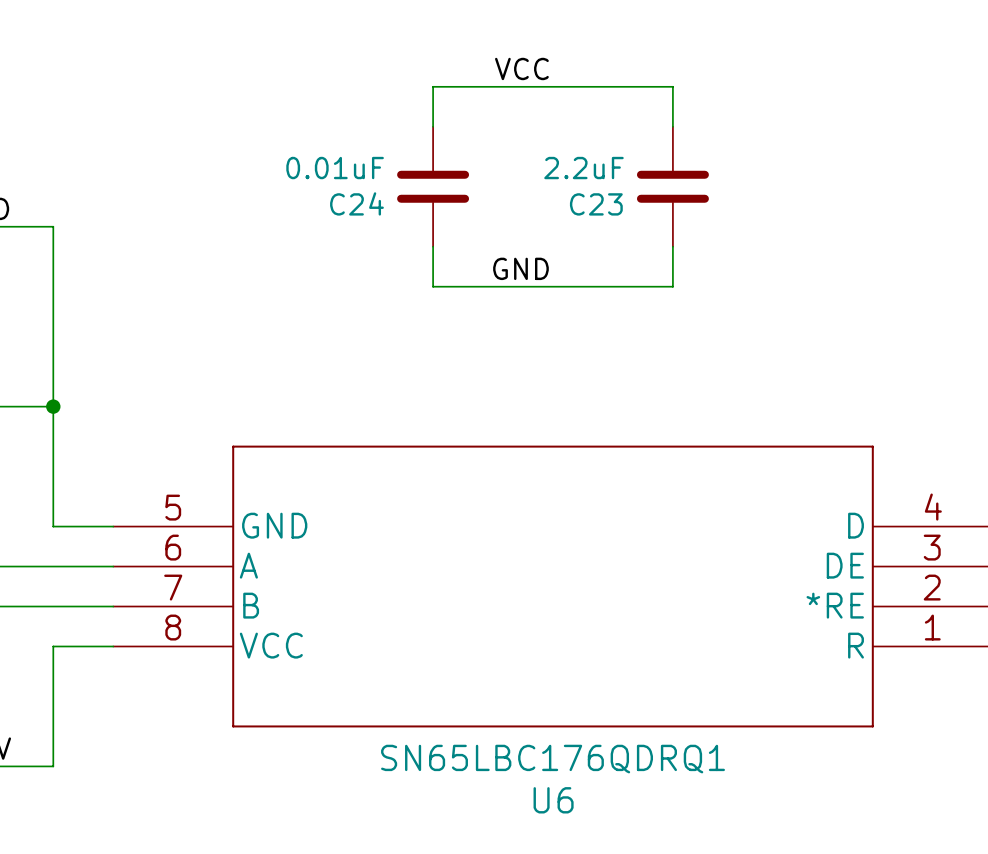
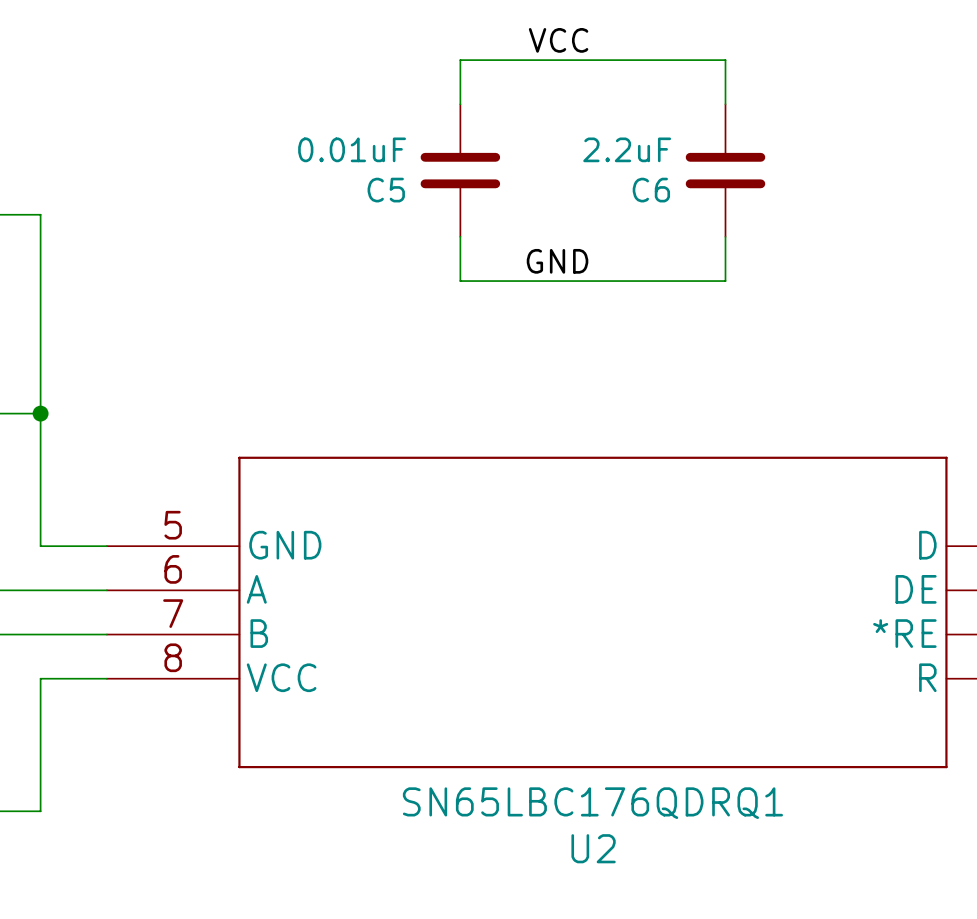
C24 name: C24 (356, 203) -> C5 (386, 190)
C23 name: C23 (596, 204) -> C6 (651, 190)
U6 name: U6 (553, 800) -> U2 (593, 848)

